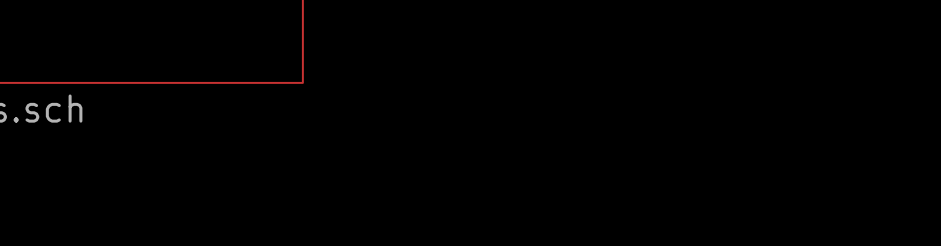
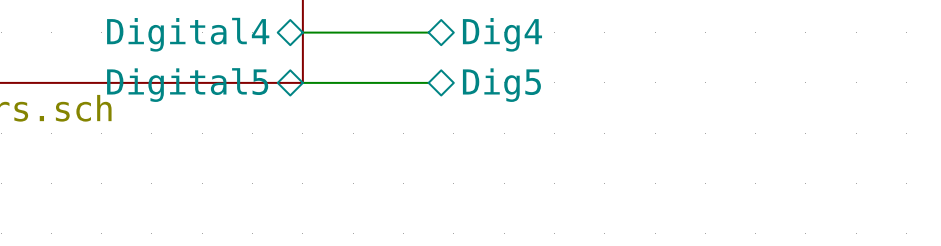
wire: none -> (302, 32) (428, 32)
sheet pin: none -> Digital4 (188, 34)
sheet pin: none -> Dig4 (502, 34)
wire: none -> (302, 82) (428, 82)
sheet pin: none -> Digital5 (187, 85)
sheet pin: none -> Dig5 (501, 85)

